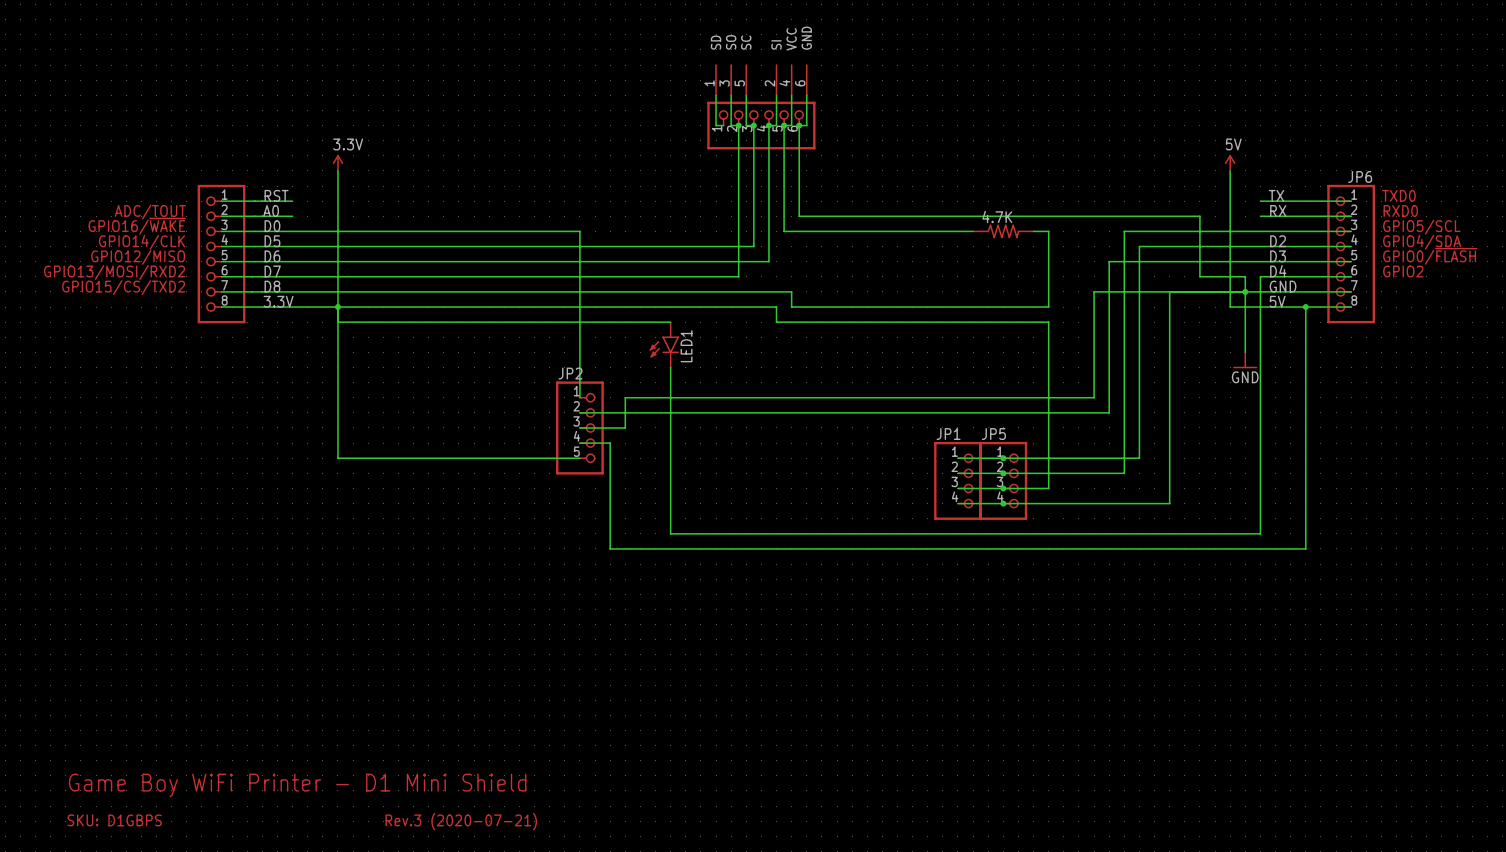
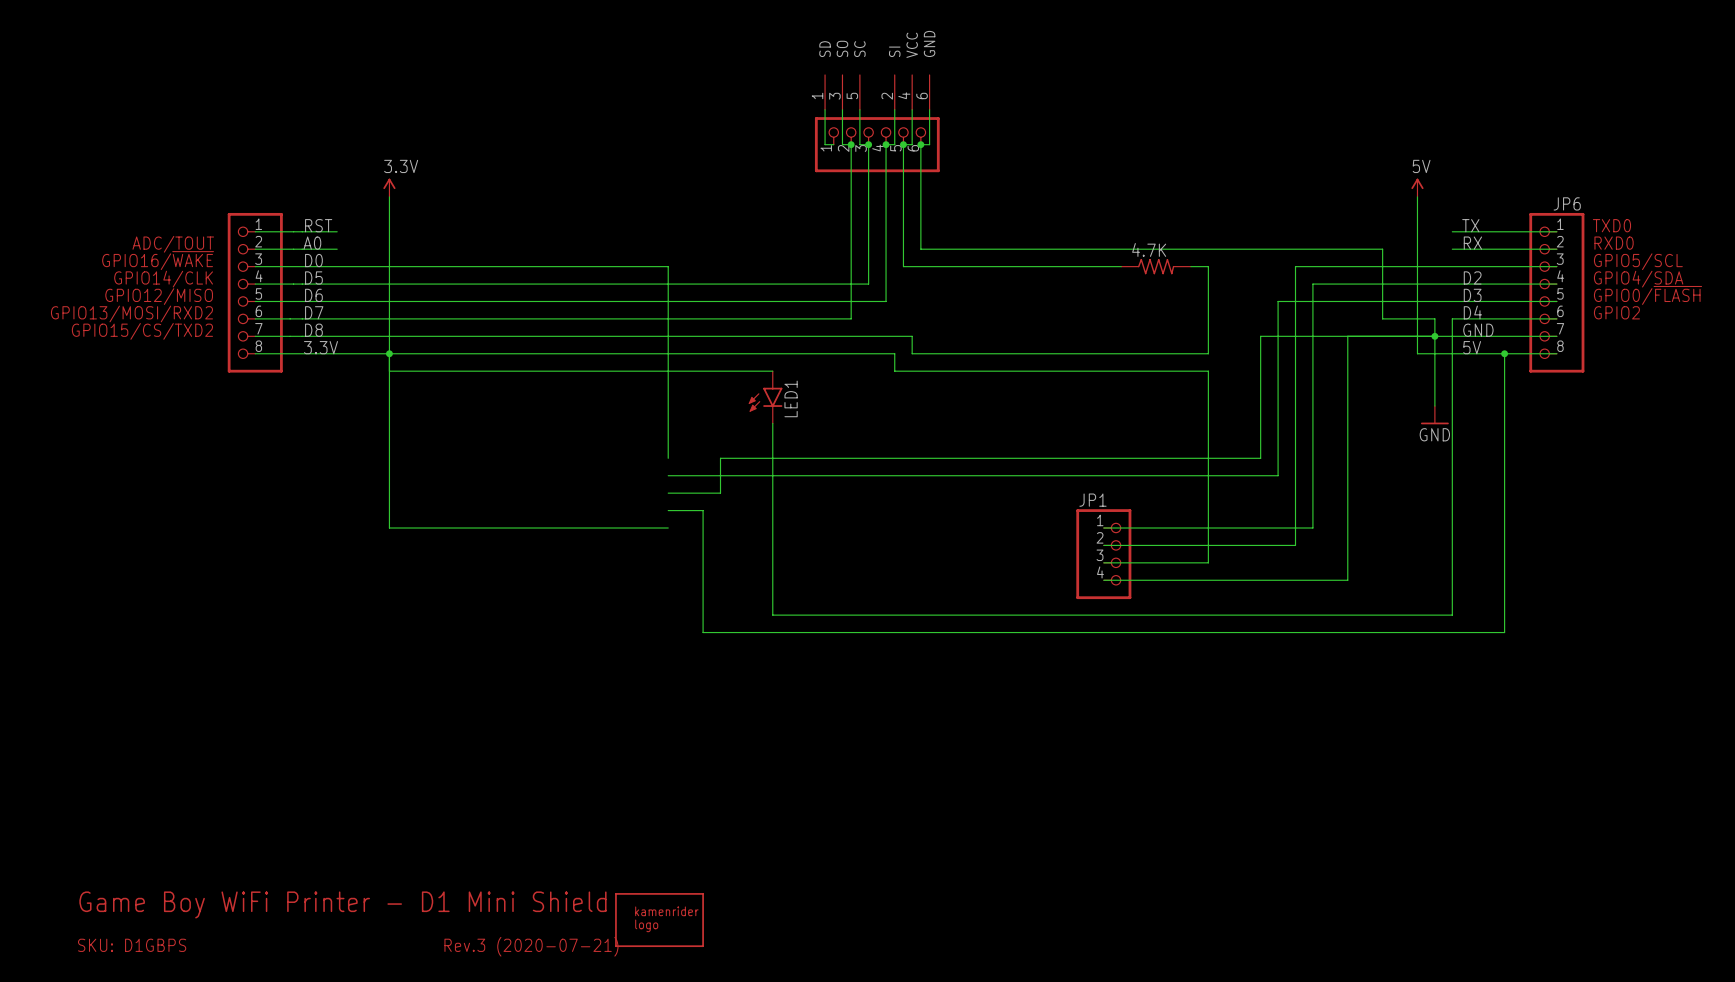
JP2: (579, 427) -> none
junction: (1003, 458) -> none
junction: (1003, 473) -> none
JP5: (1003, 480) -> none
junction: (1003, 488) -> none
junction: (1003, 503) -> none
part: none -> (659, 920)

